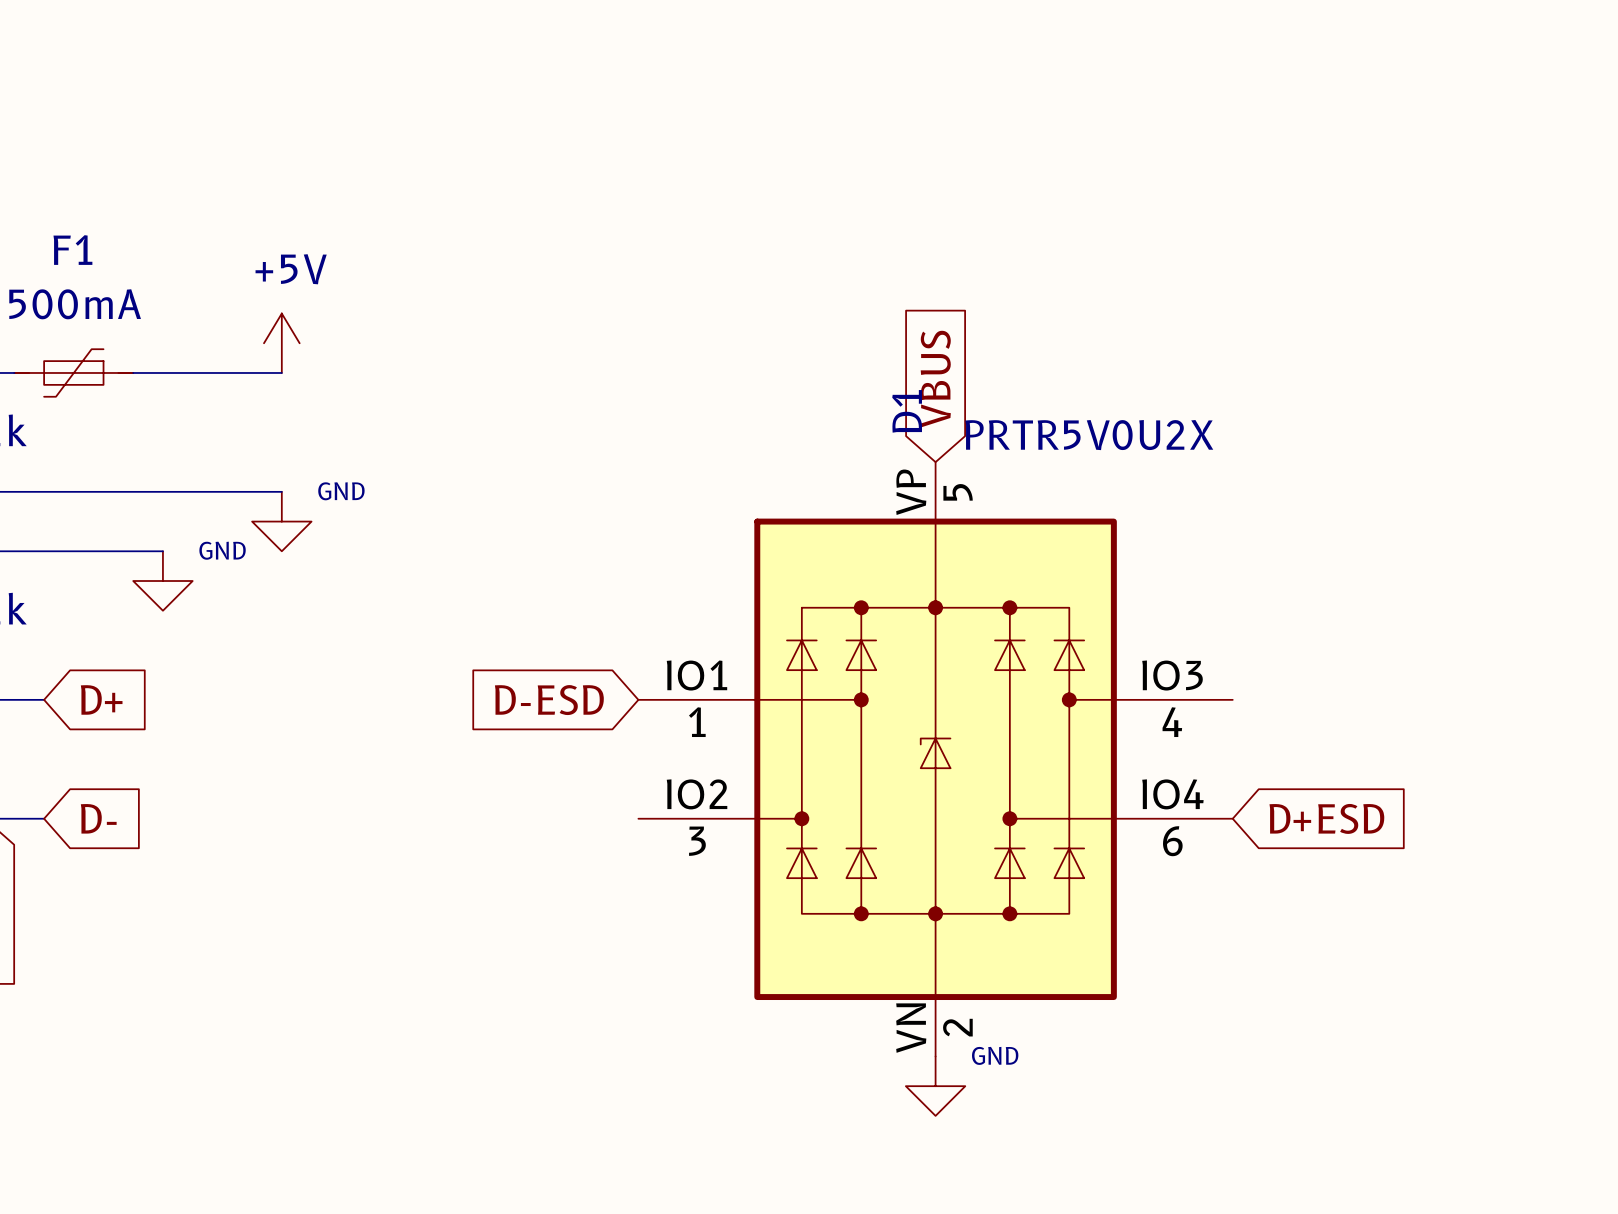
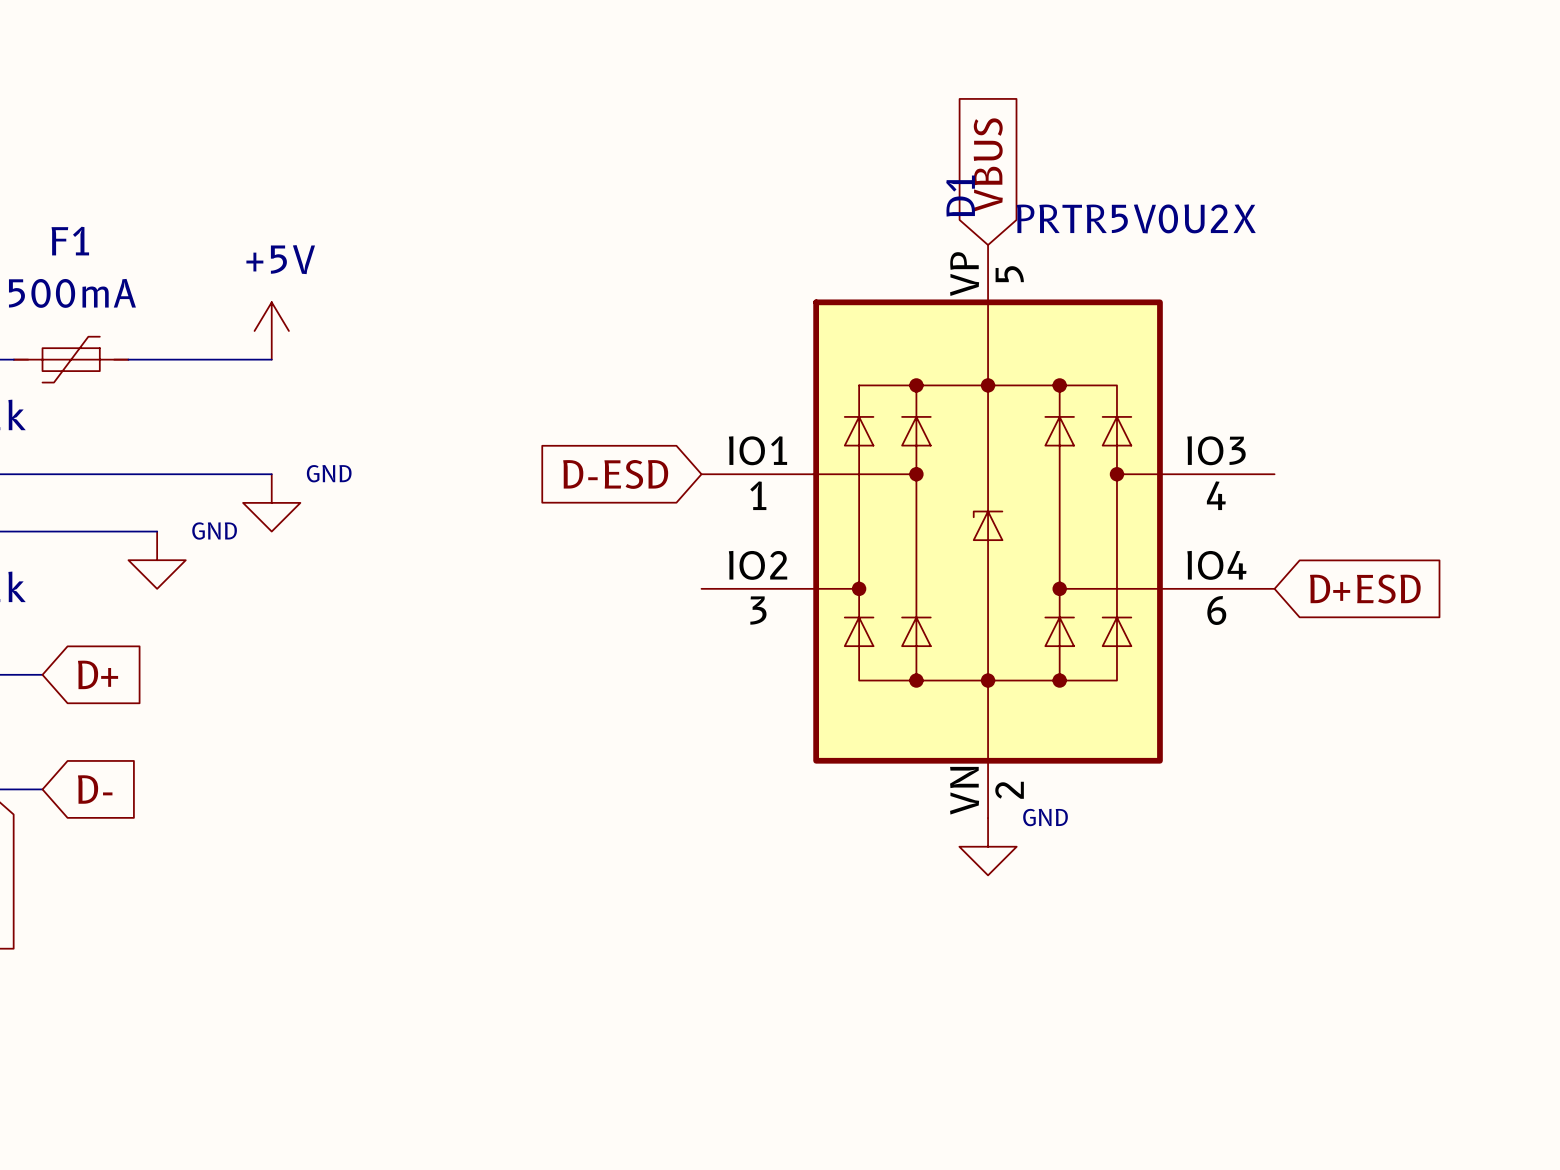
global label position: VBUS (935, 379) -> VBUS (988, 164)
global label position: D-ESD (549, 700) -> D-ESD (615, 474)
D1 position: (935, 759) -> (988, 531)
global label position: D+ESD (1326, 818) -> D+ESD (1365, 589)
power symbol position: GND (935, 1086) -> GND (988, 846)

